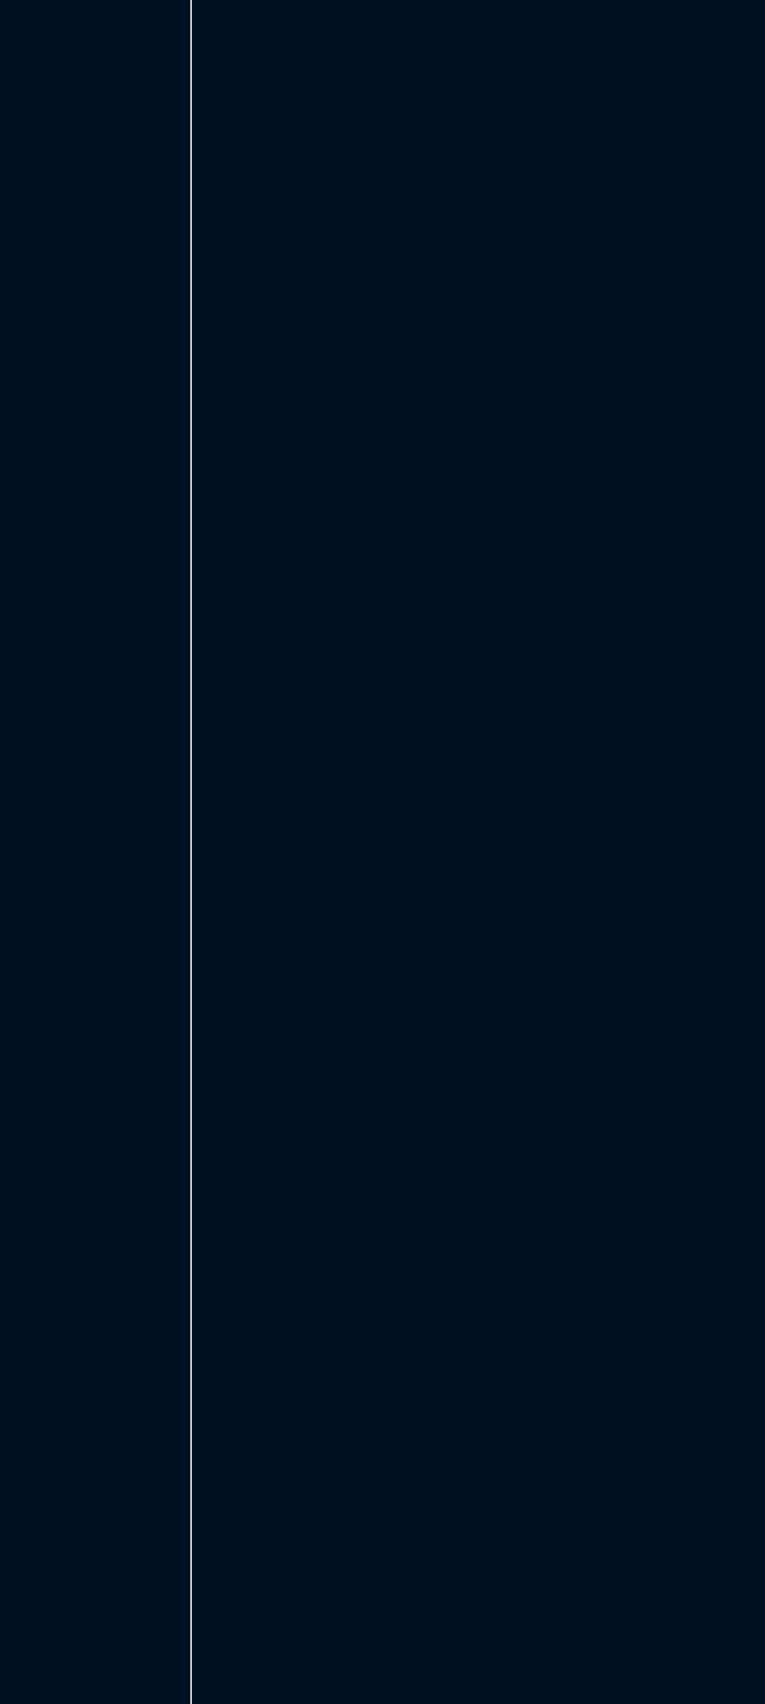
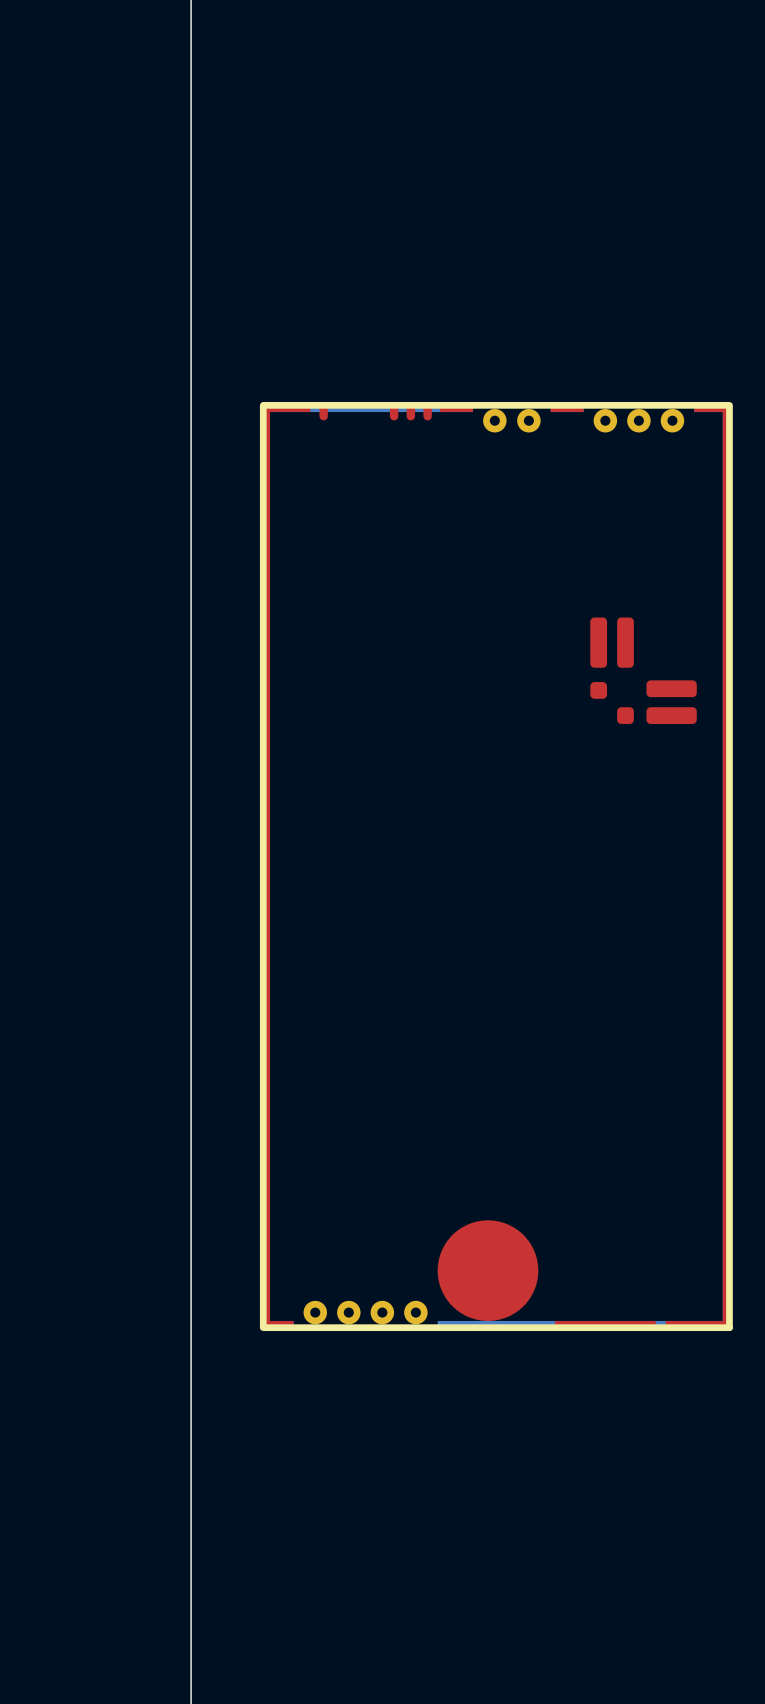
part: none -> (496, 866)

